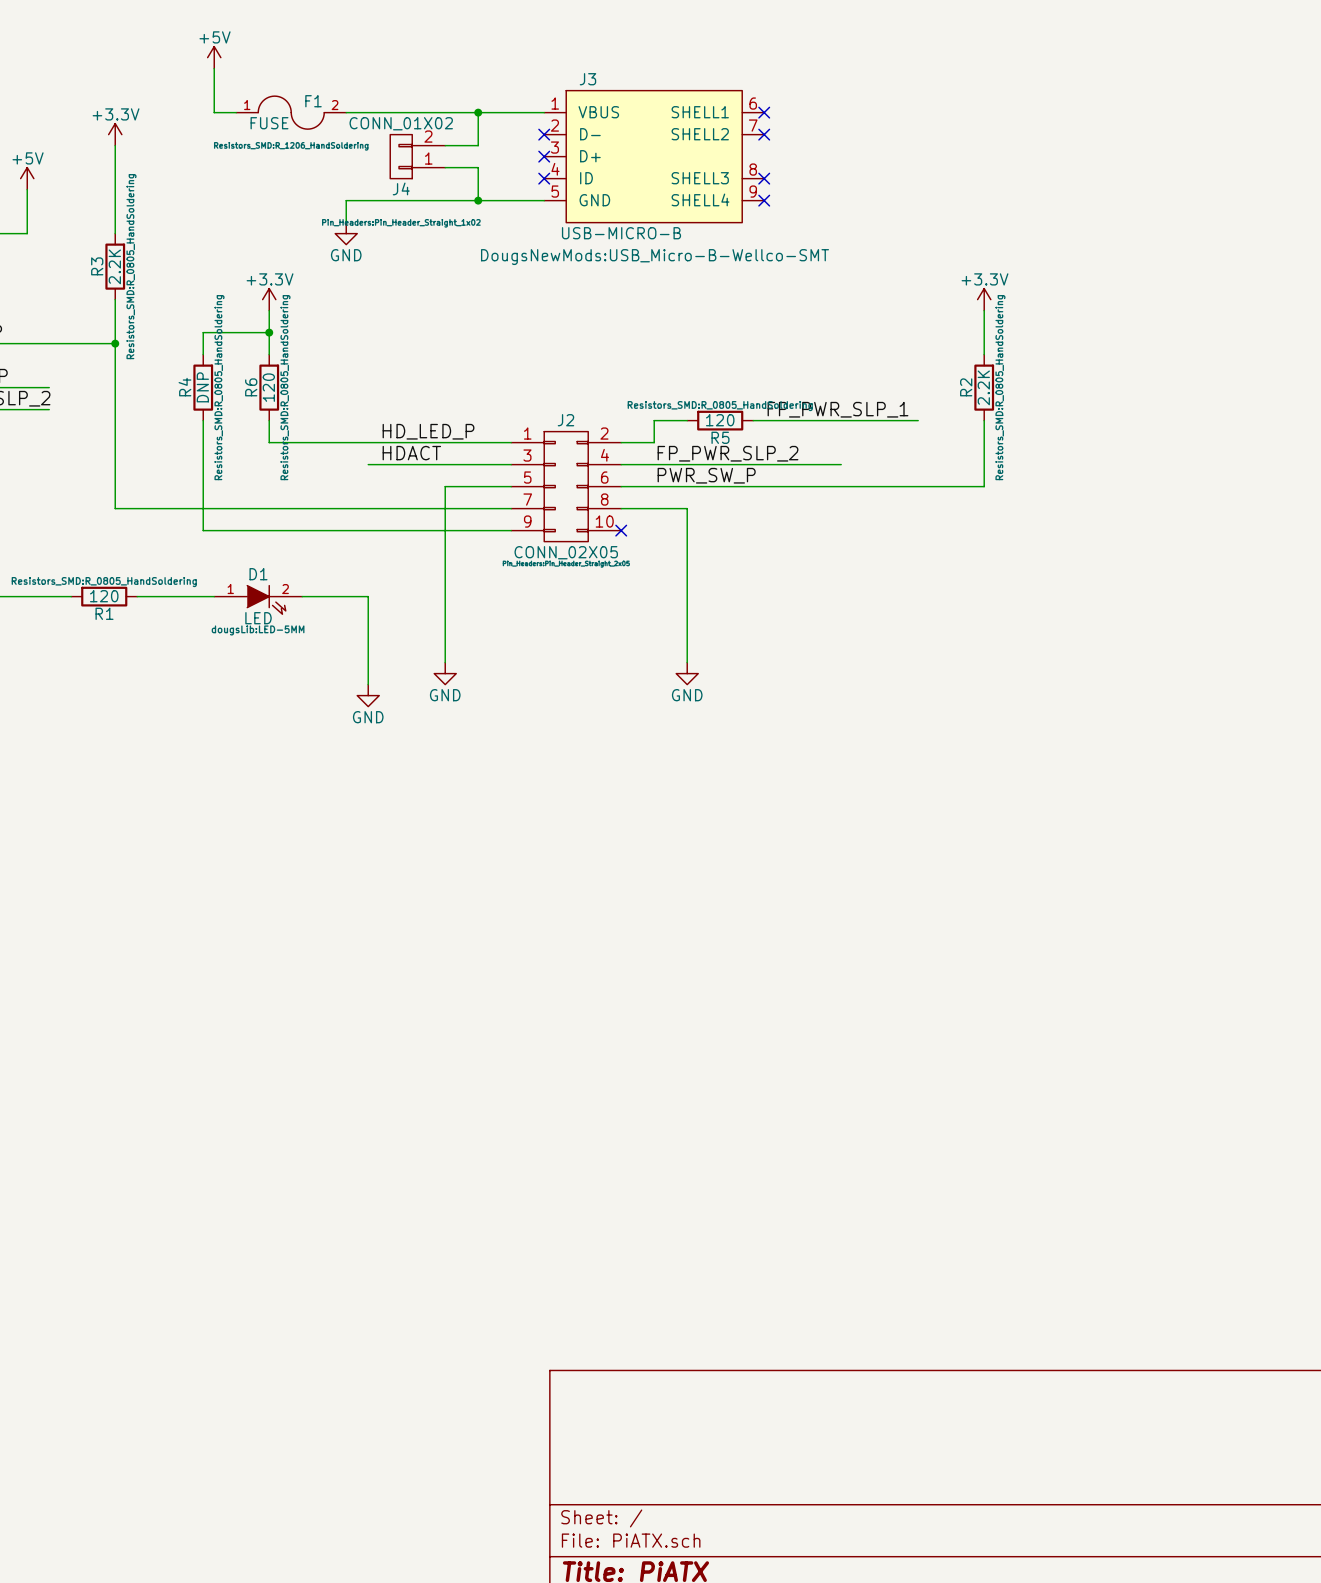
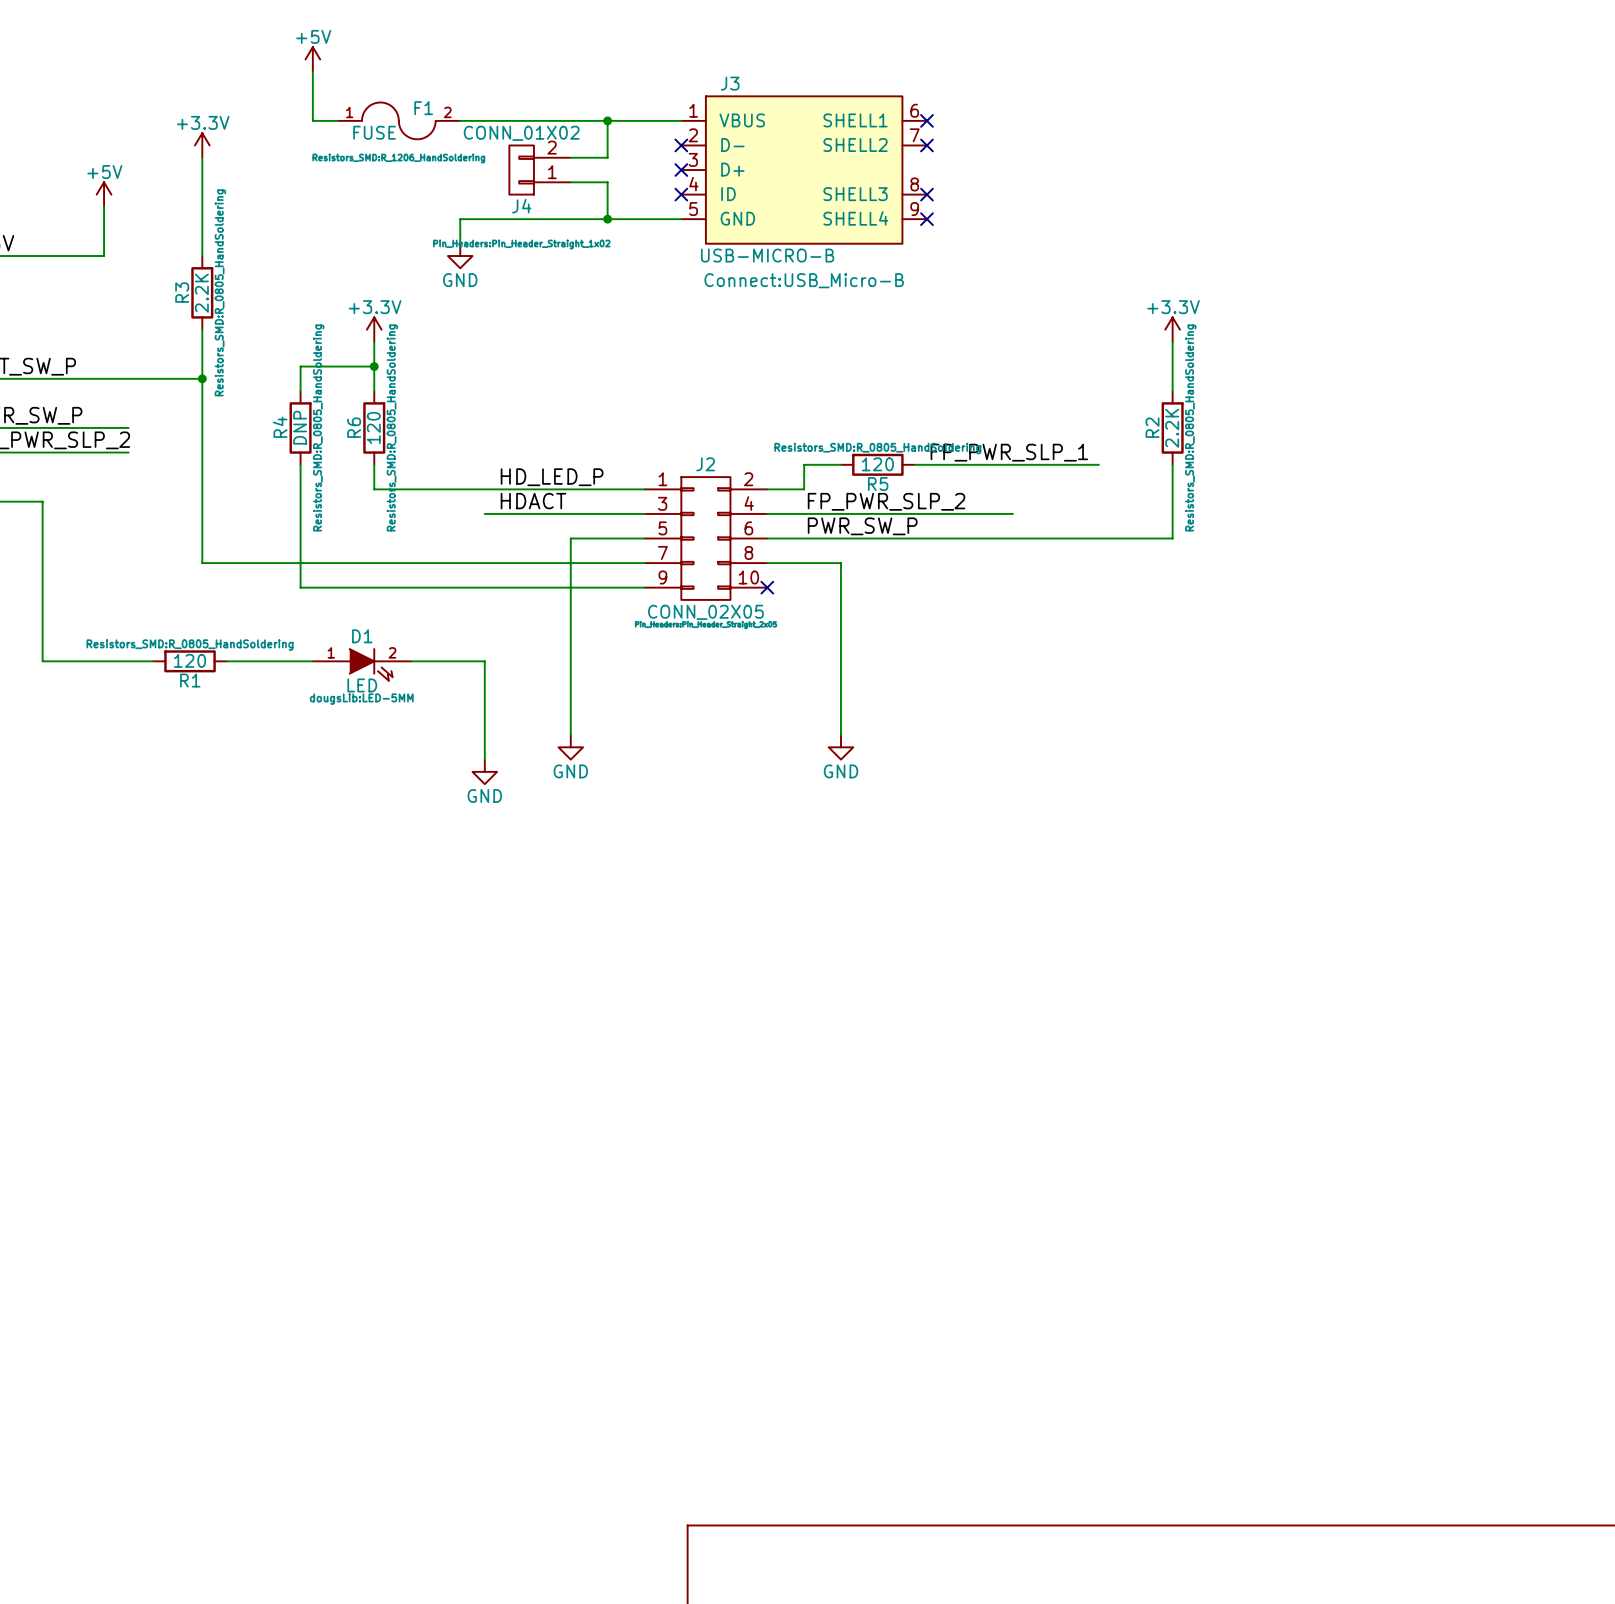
J3 text: DougsNewMods:USB_Micro-B-Wellco-SMT (655, 257) -> Connect:USB_Micro-B (804, 280)

